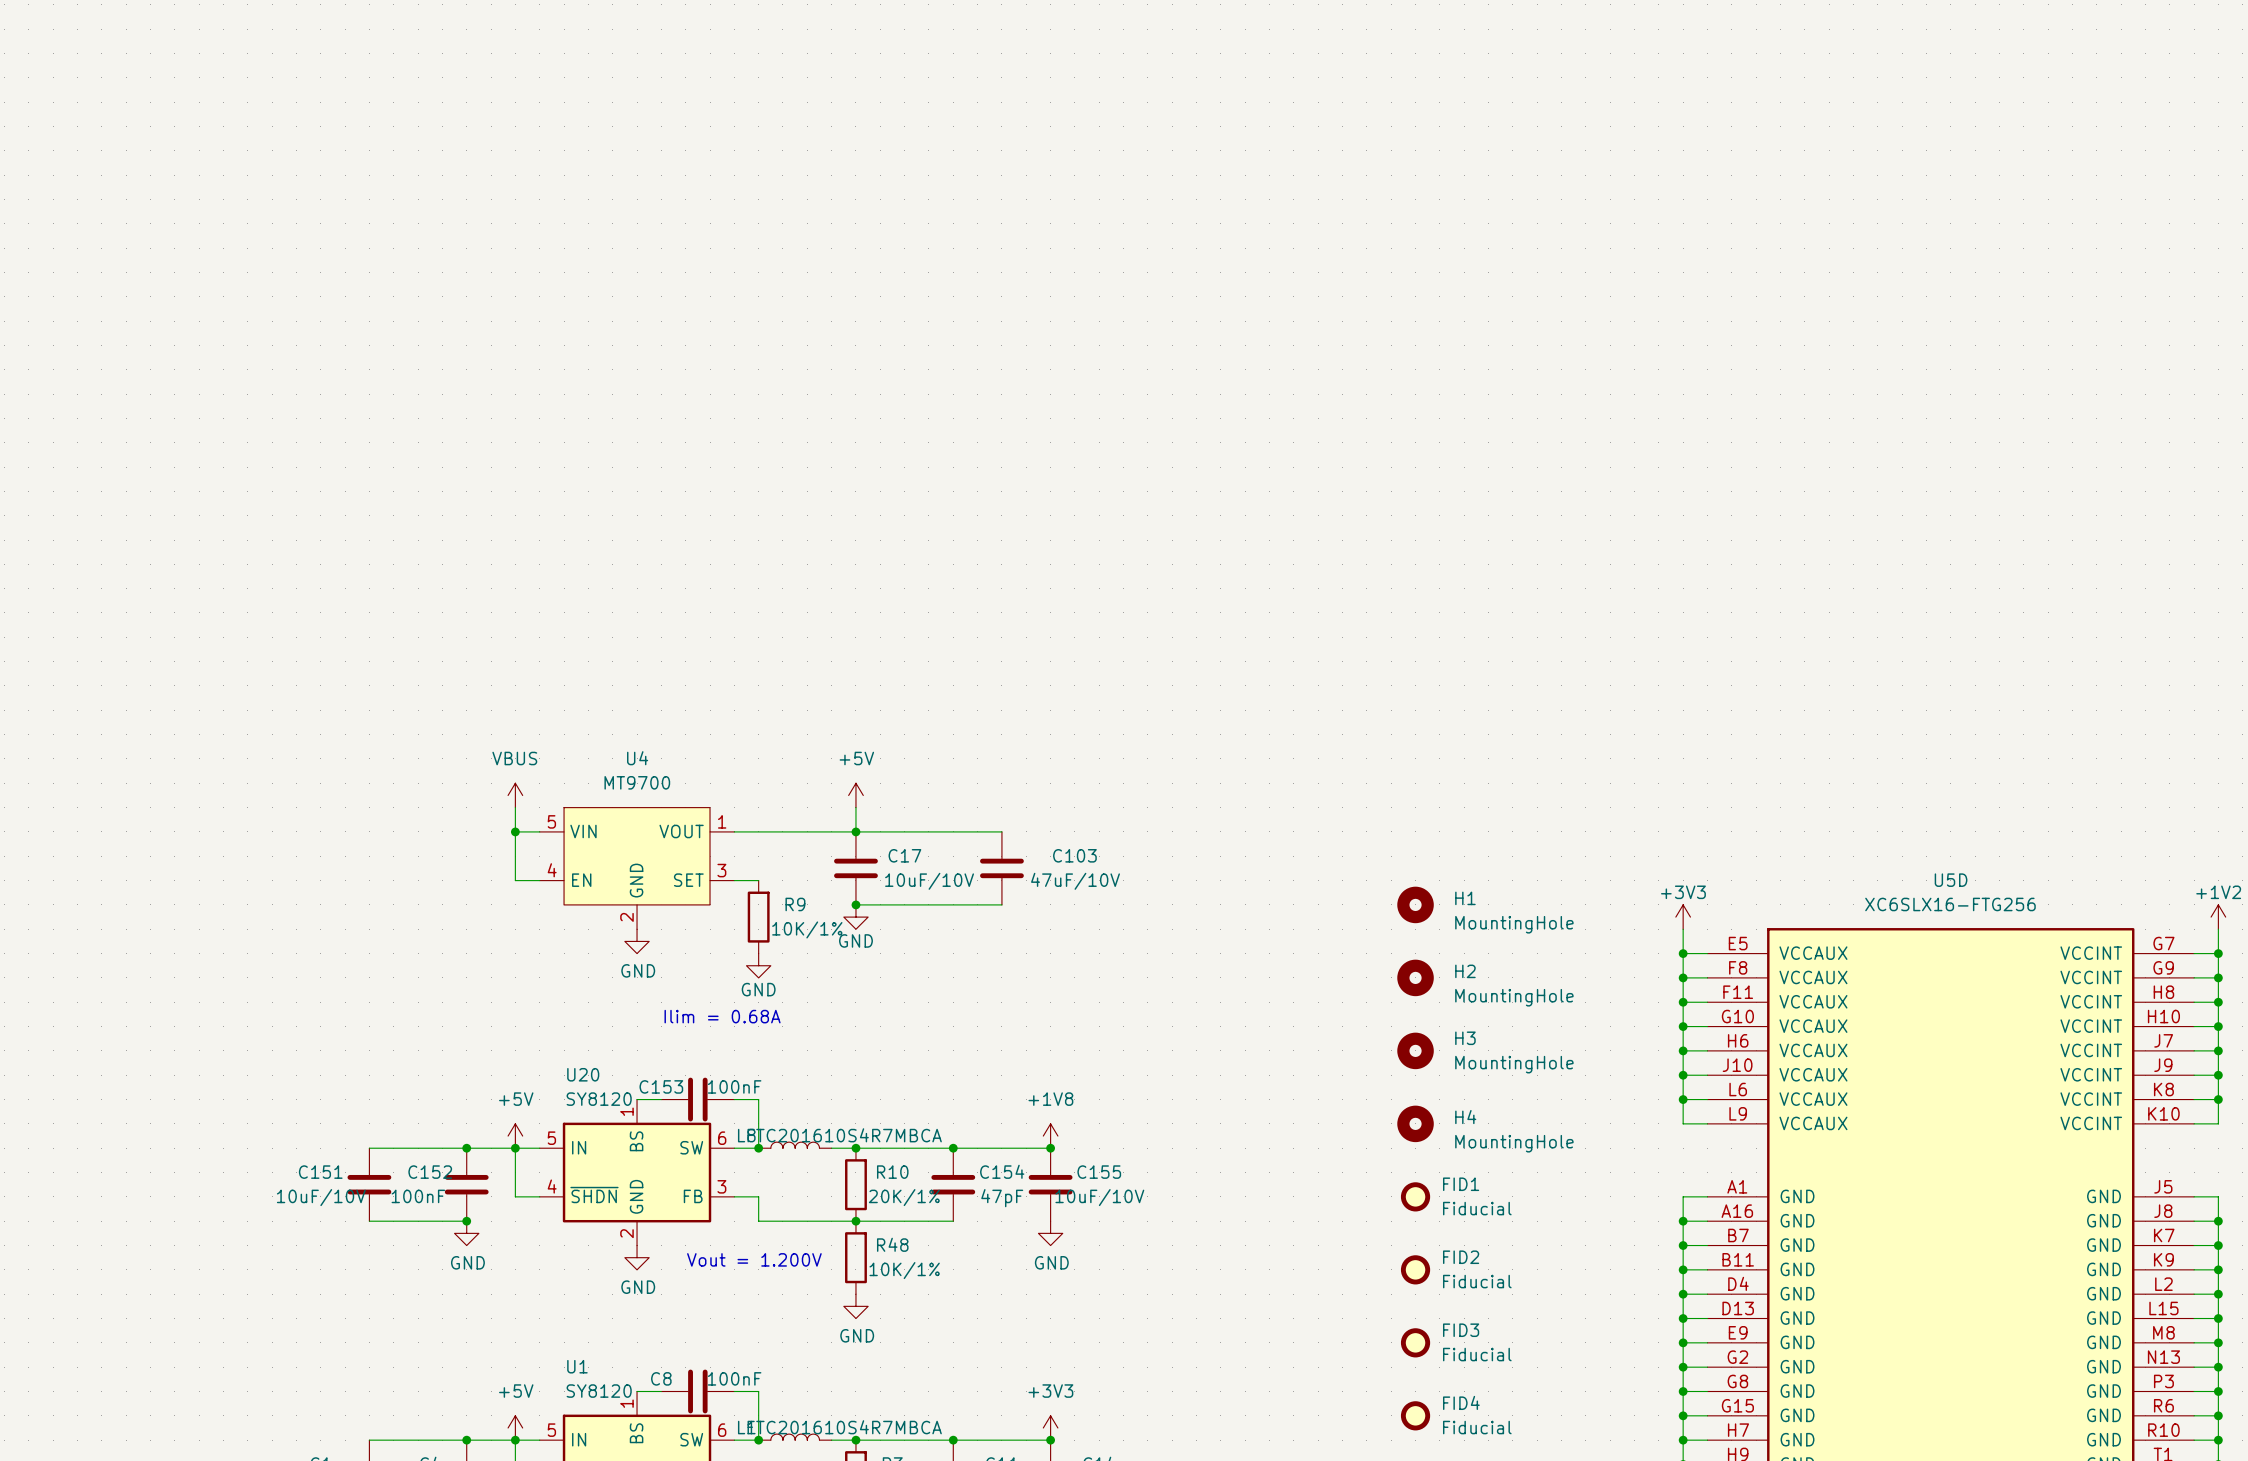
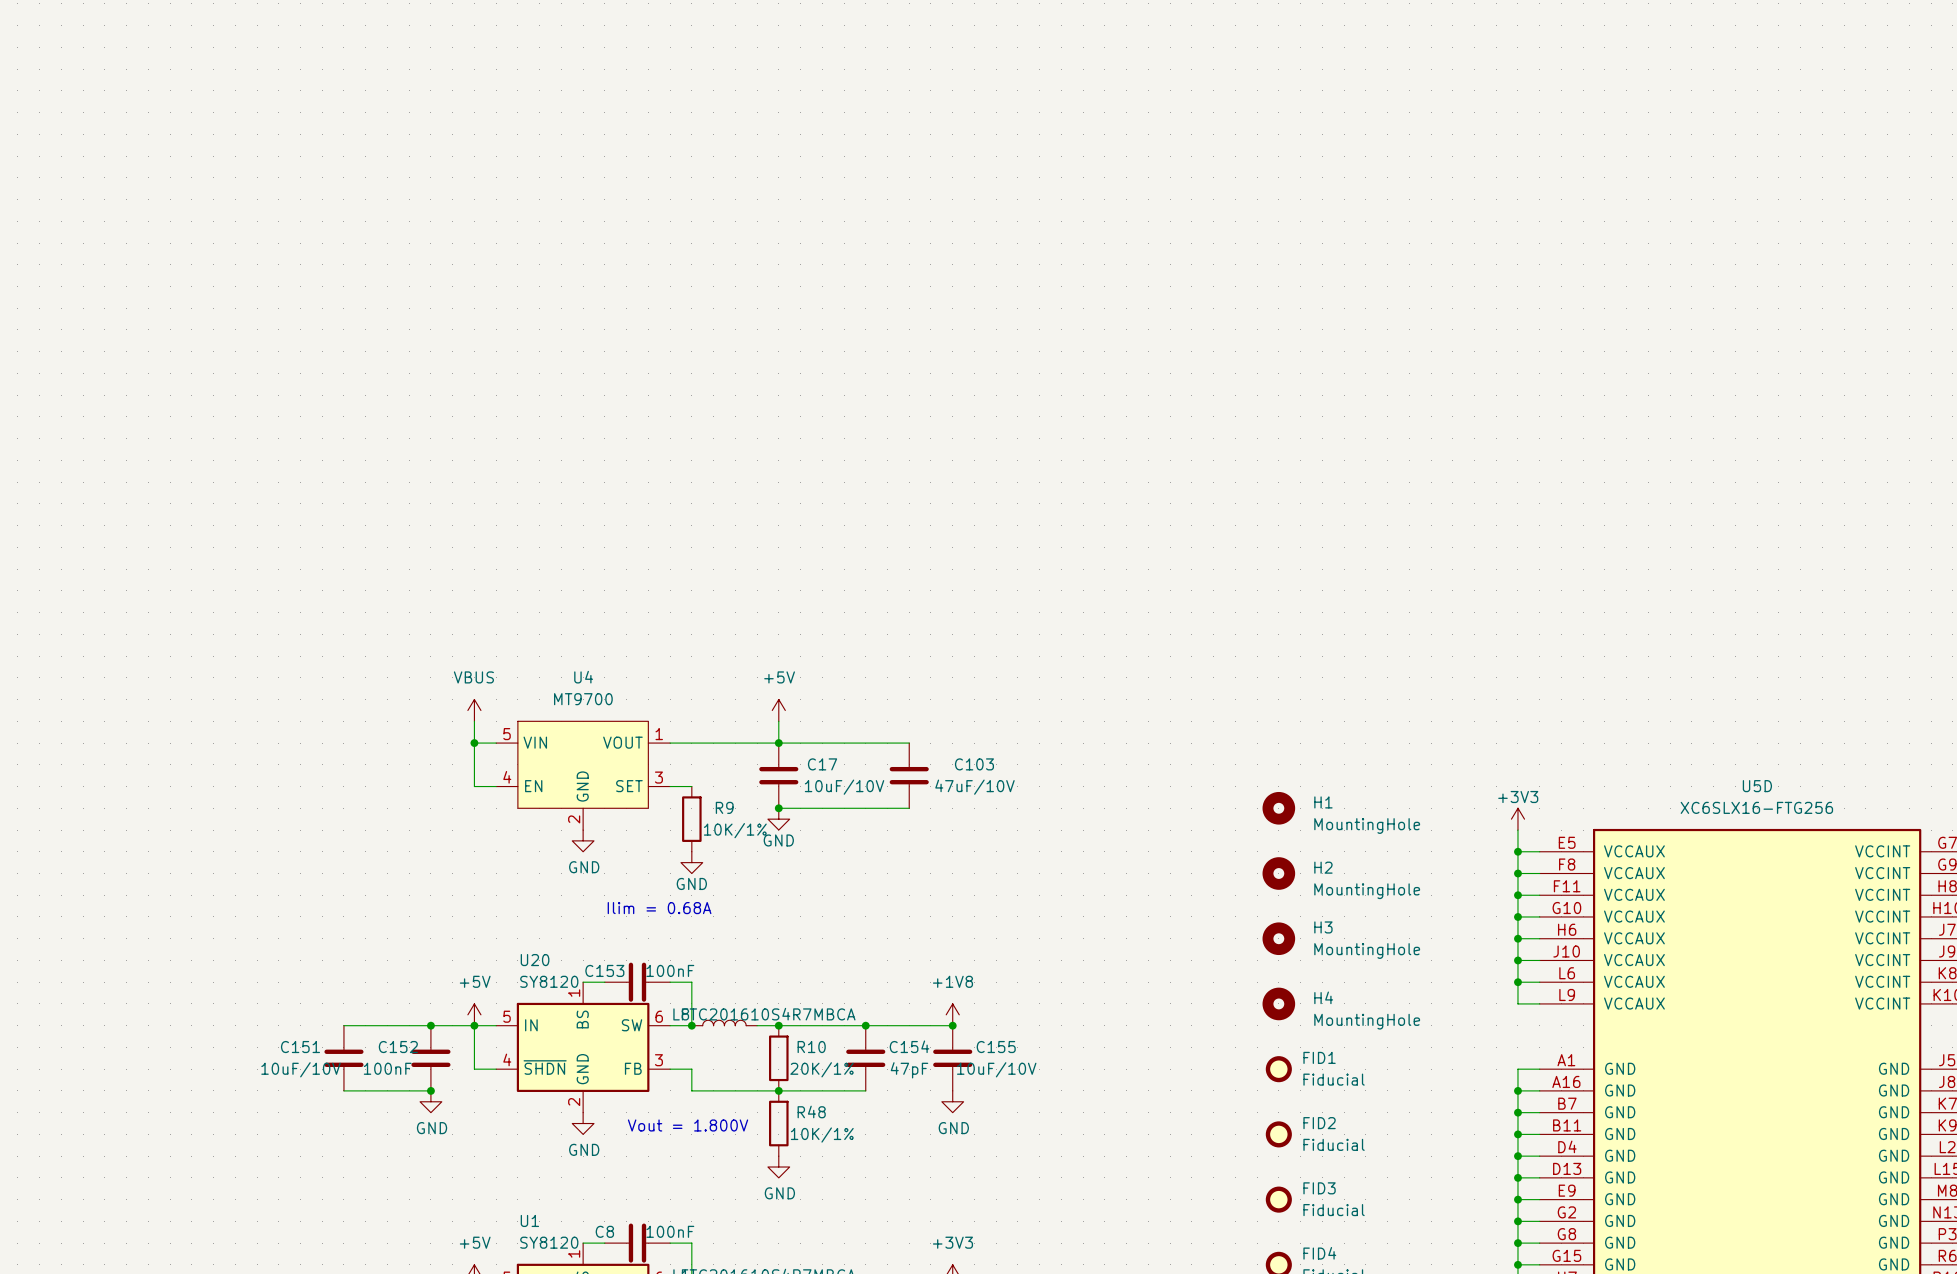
text: Vout = 1.200V (754, 1259) -> Vout = 1.800V (688, 1125)

